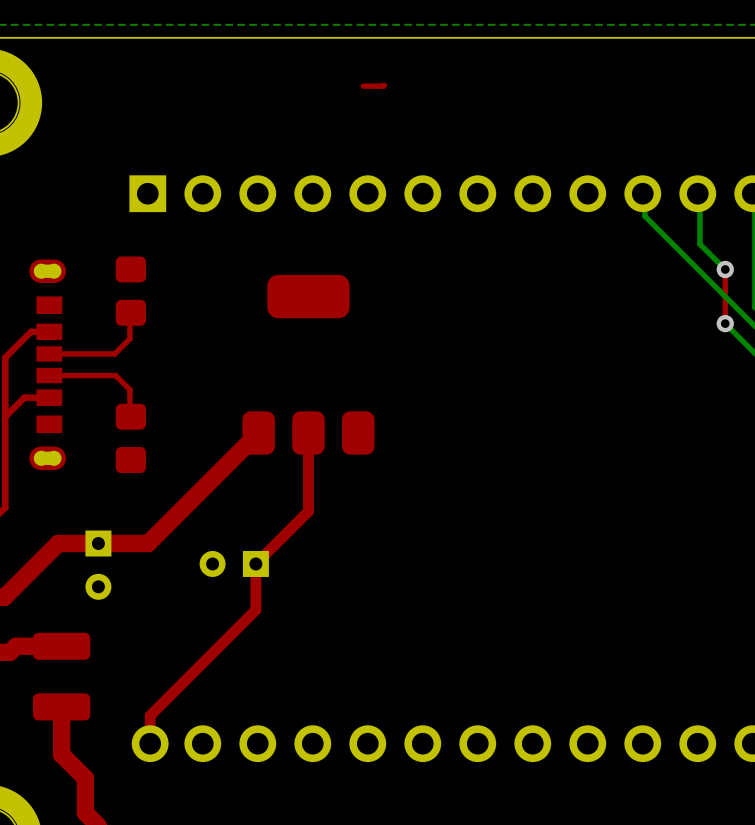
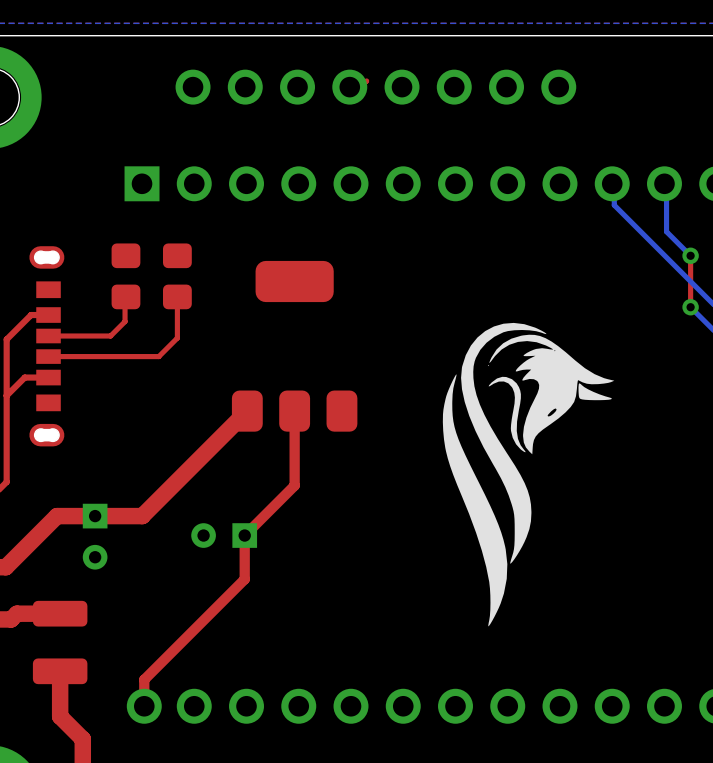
part: none -> (375, 87)
drawing: none -> [442, 322, 615, 627]
top track: (115, 375) (129, 389) (129, 414) -> (111, 356) (158, 356) (177, 338) (177, 296)
part position: (130, 438) -> (177, 276)

